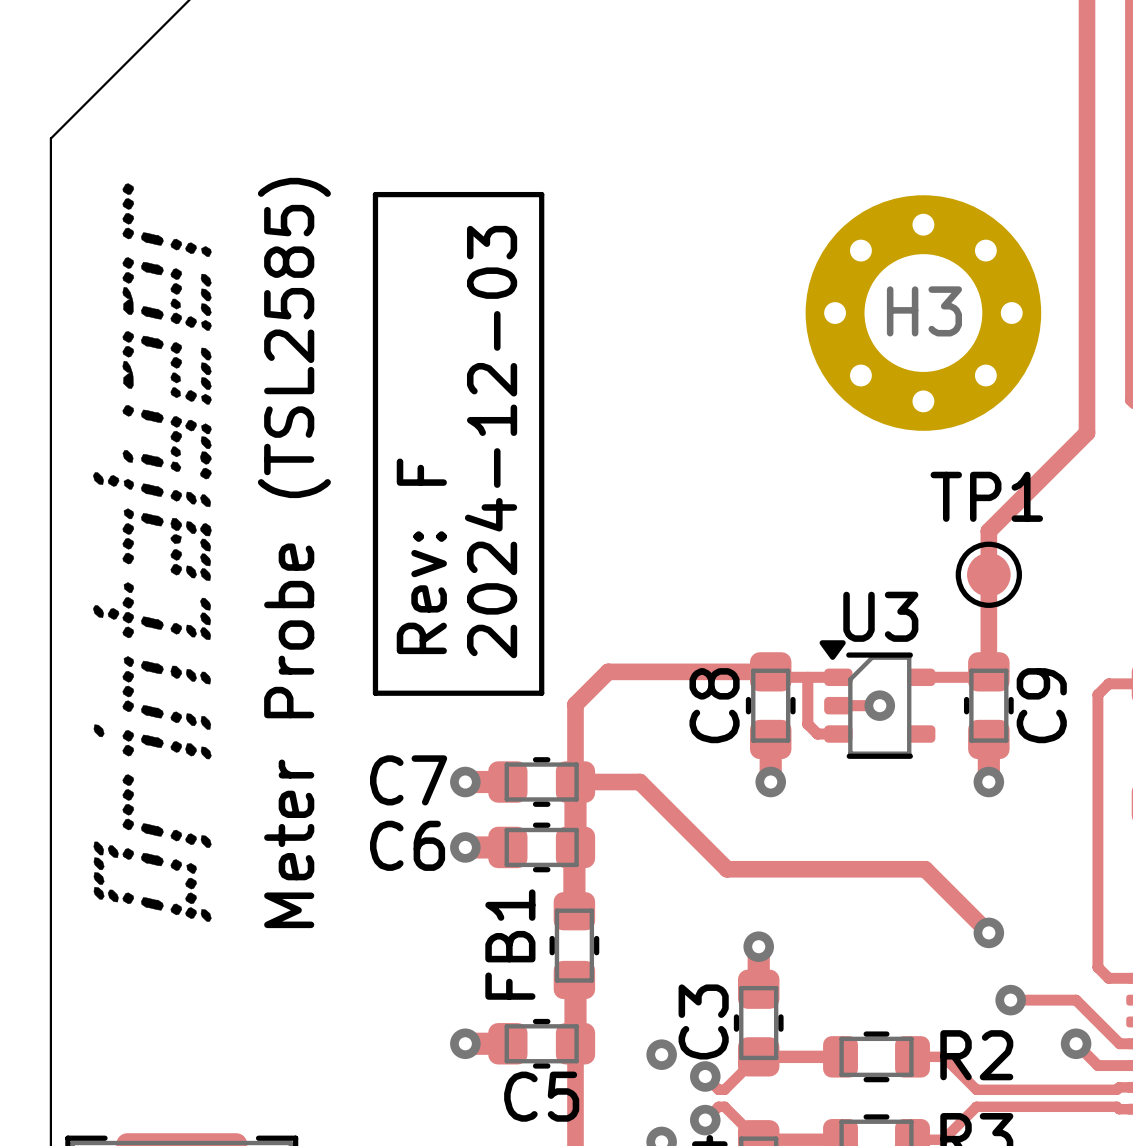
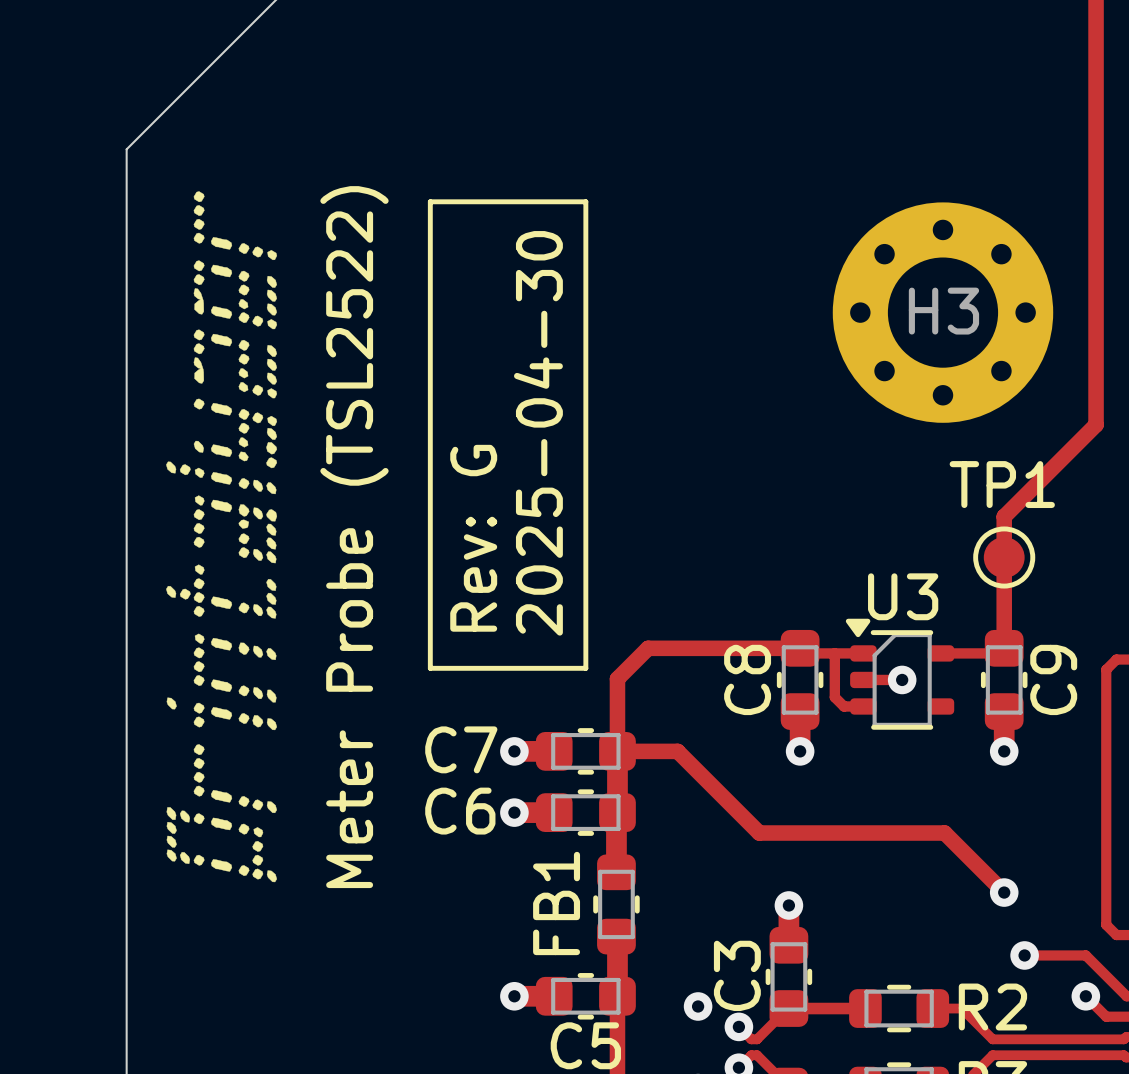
text: 2024-12-03 (491, 442) -> 2025-04-30 (538, 433)
text: Meter Probe (TSL2585) (294, 552) -> Meter Probe (TSL2522) (354, 537)
text: Rev: F (421, 556) -> Rev: G (473, 538)

